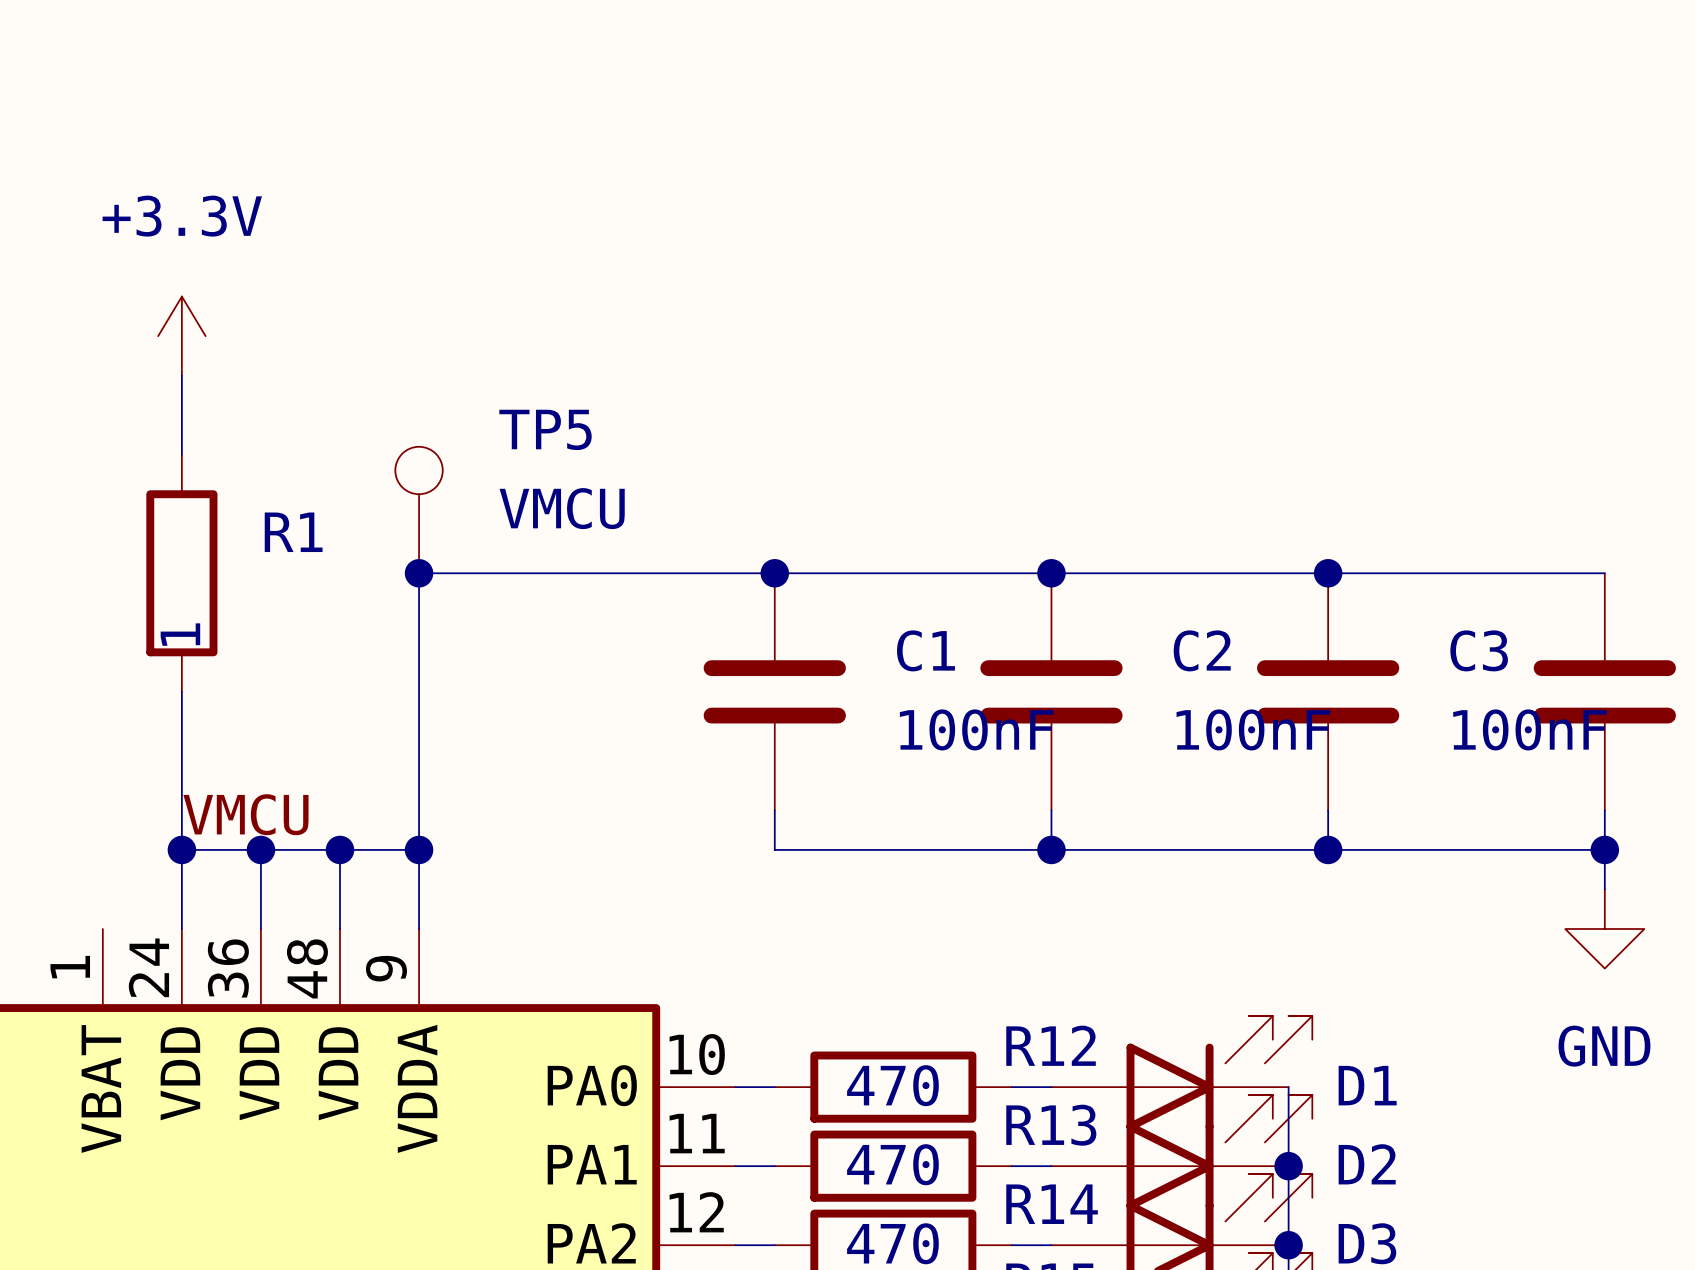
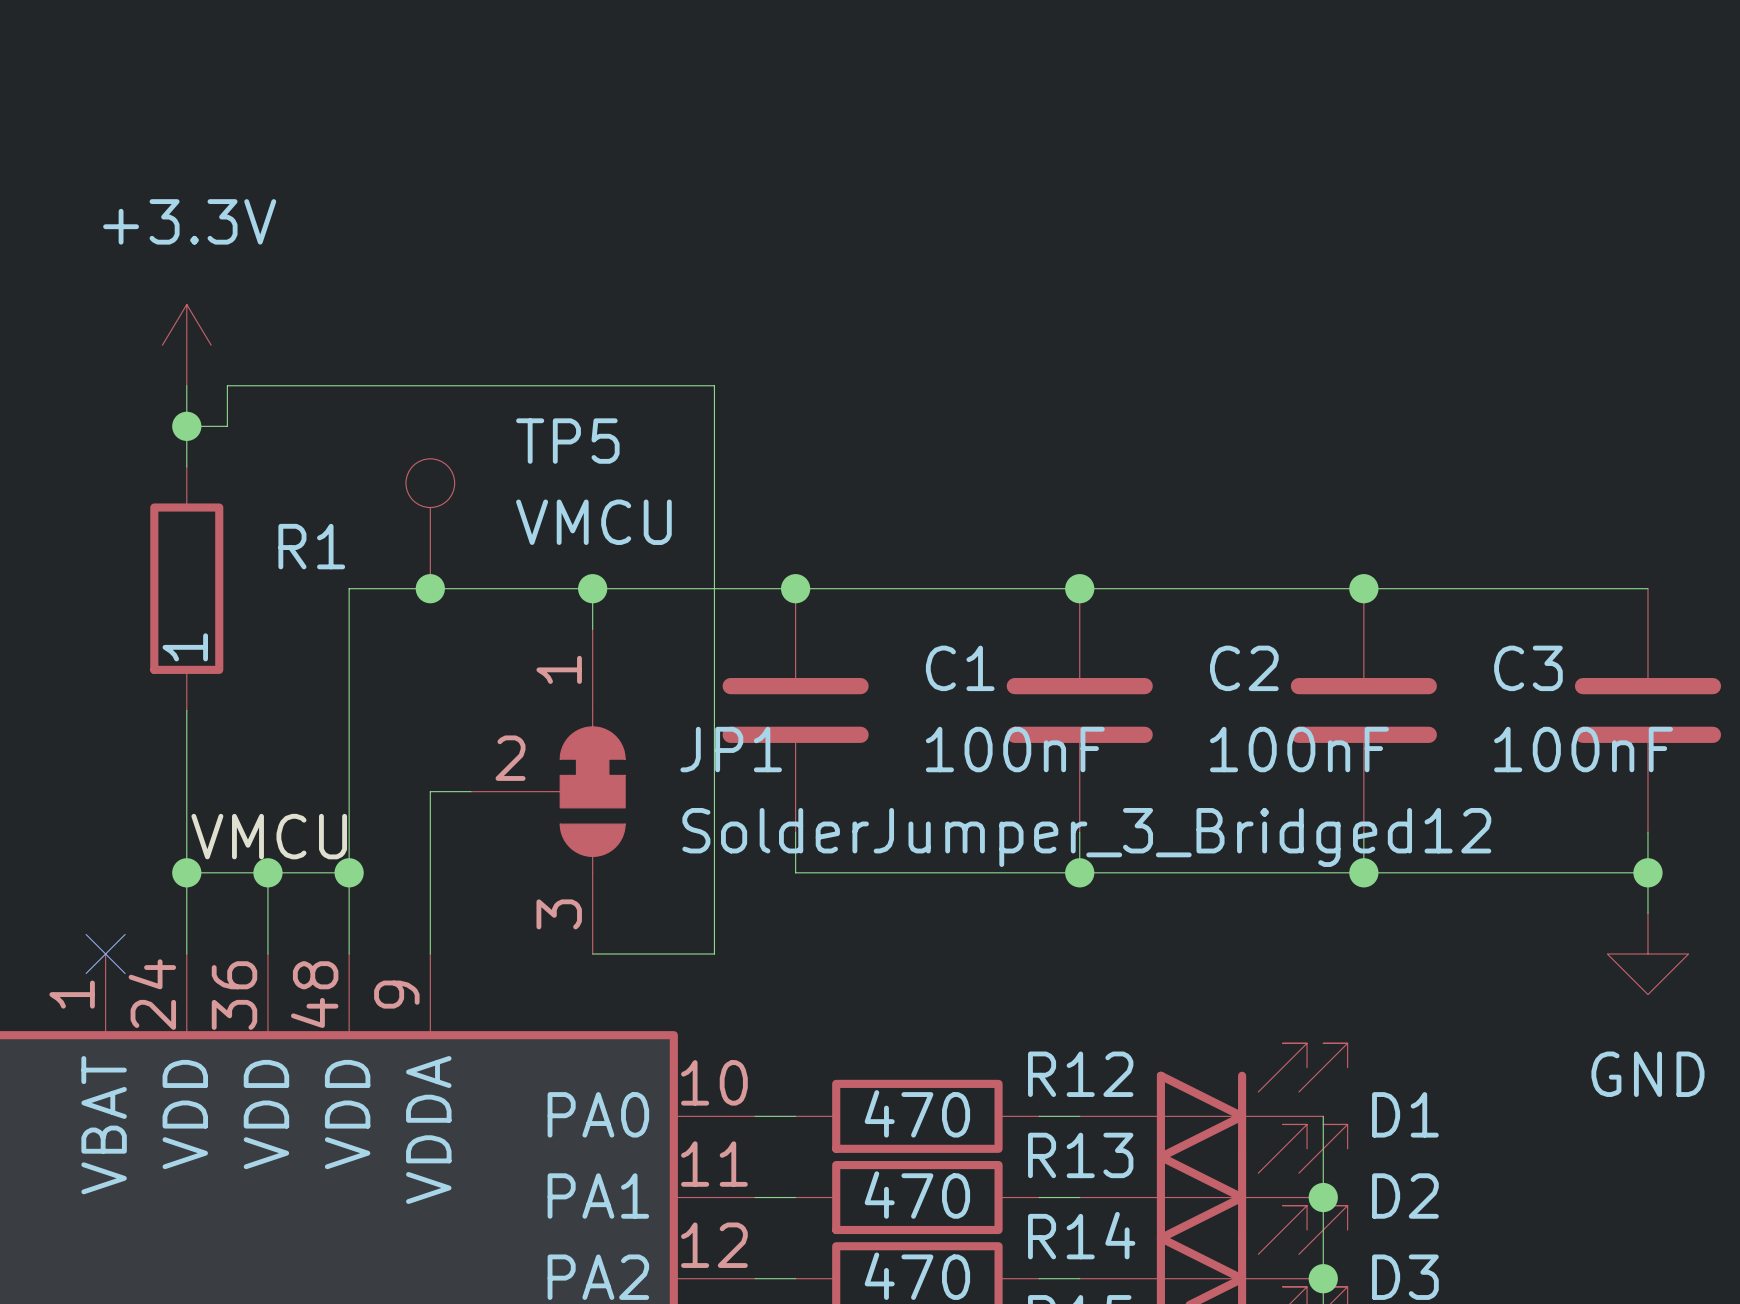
wire: none -> (186, 426) (227, 426) (227, 385) (714, 385) (714, 953) (592, 953)
junction: none -> (186, 426)
wire: (419, 573) (419, 770) -> (430, 588) (349, 588) (349, 872)
wire: none -> (592, 588) (592, 629)
junction: none -> (592, 588)
wire: none -> (430, 791) (470, 791)
JP1: none -> SolderJumper_3_Bridged12 (548, 791)
wire: (340, 849) (419, 849) -> none
junction: (419, 849) -> none
no-connect mark: none -> (105, 953)

